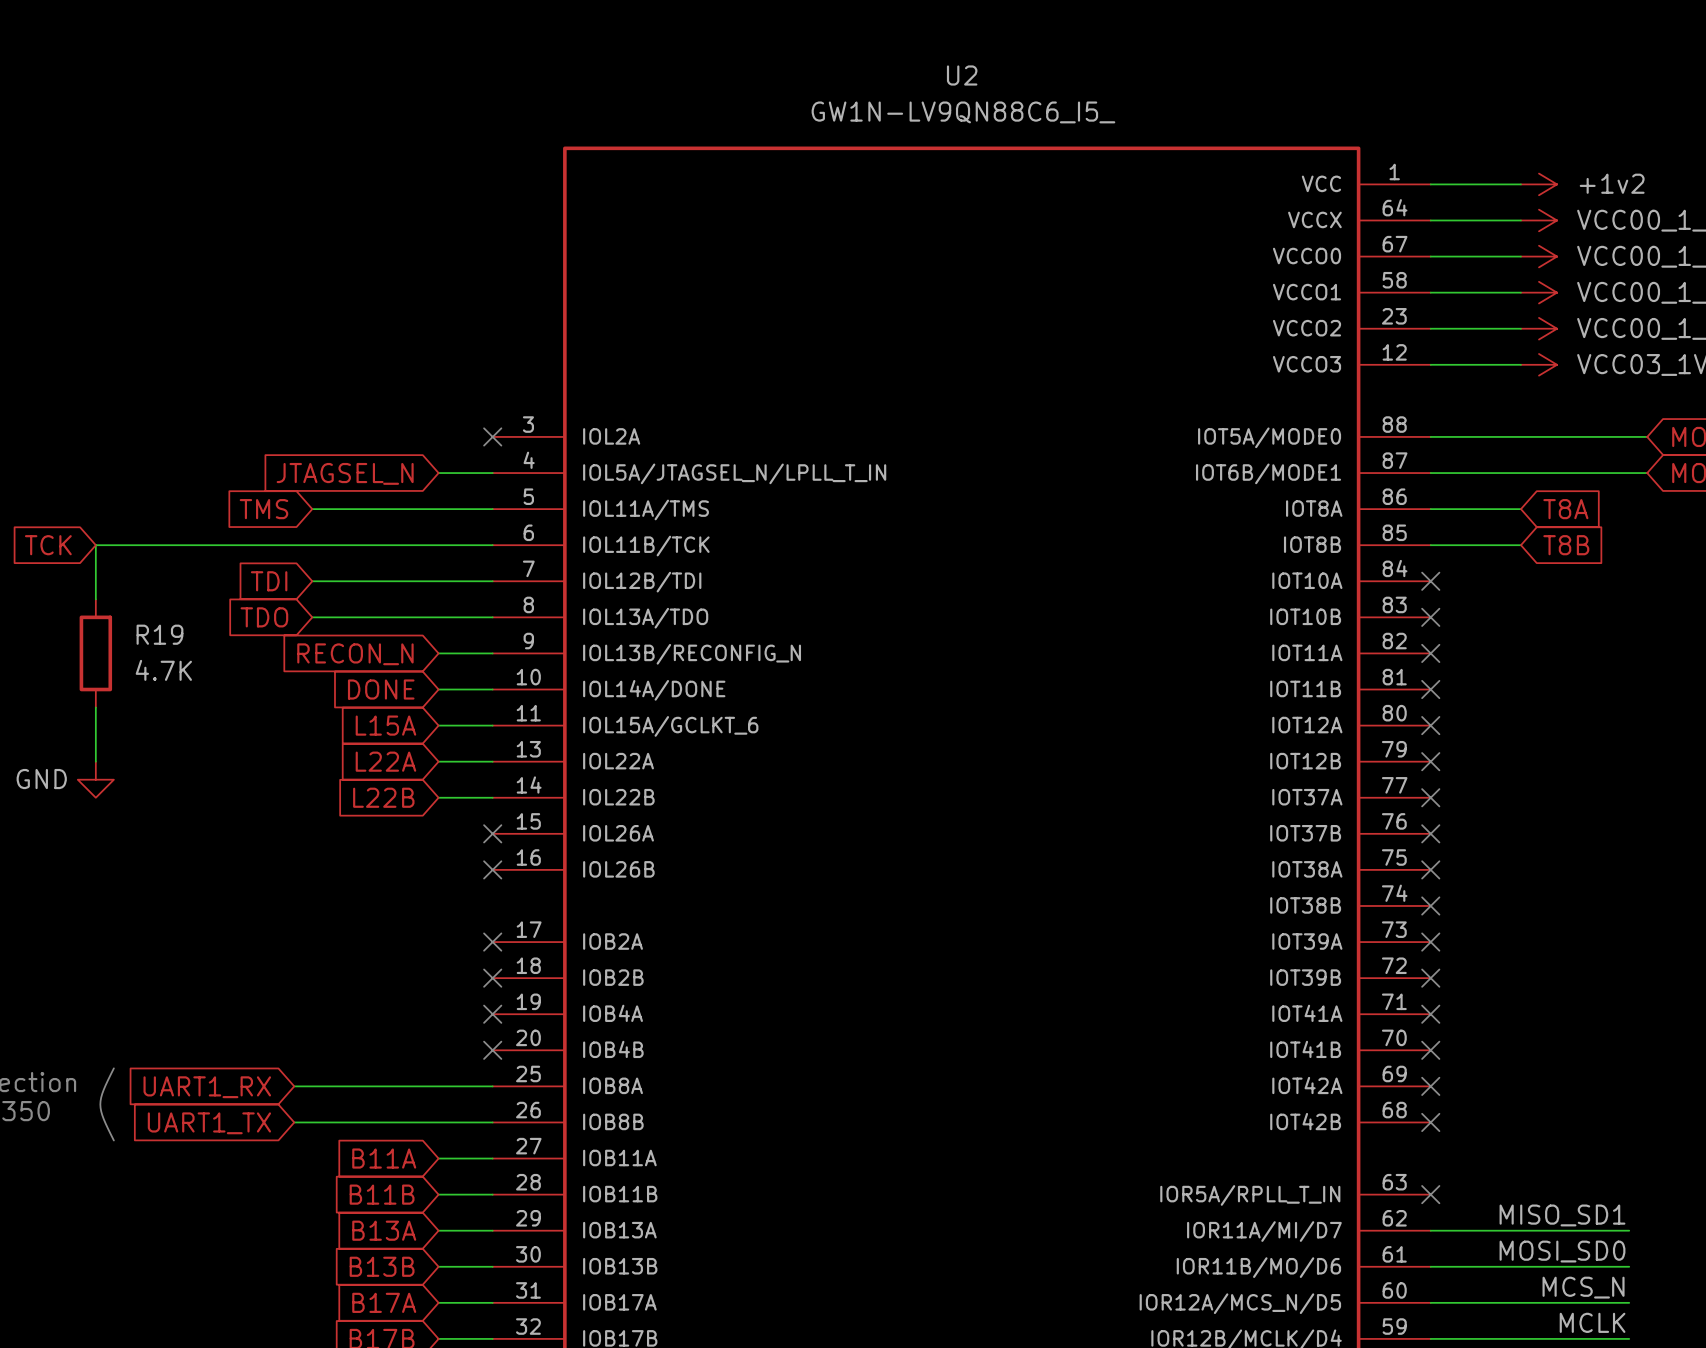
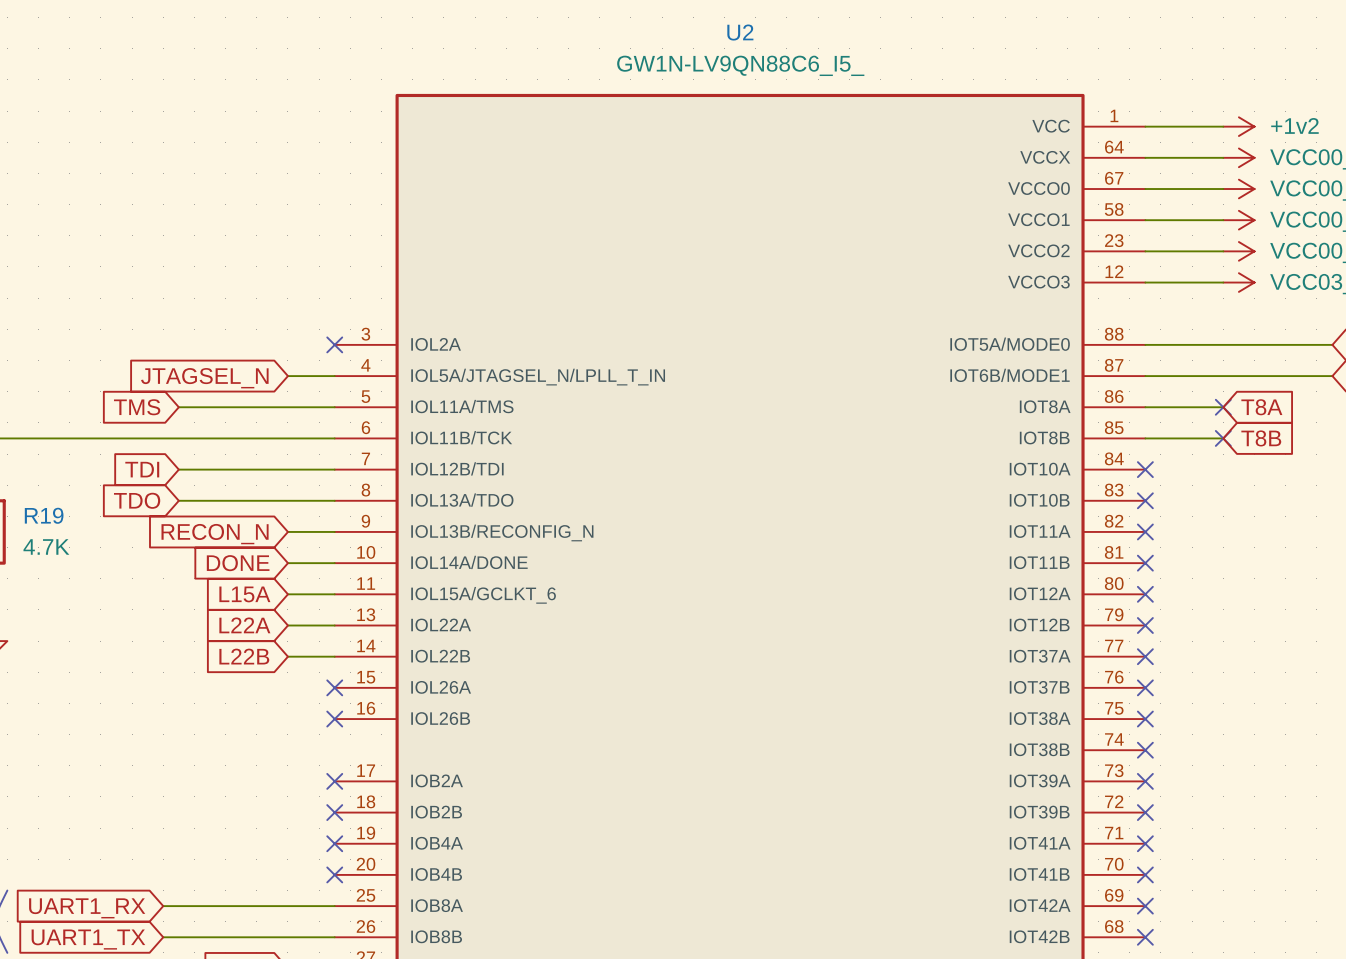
no-connect mark: none -> (1223, 407)
no-connect mark: none -> (1223, 438)

